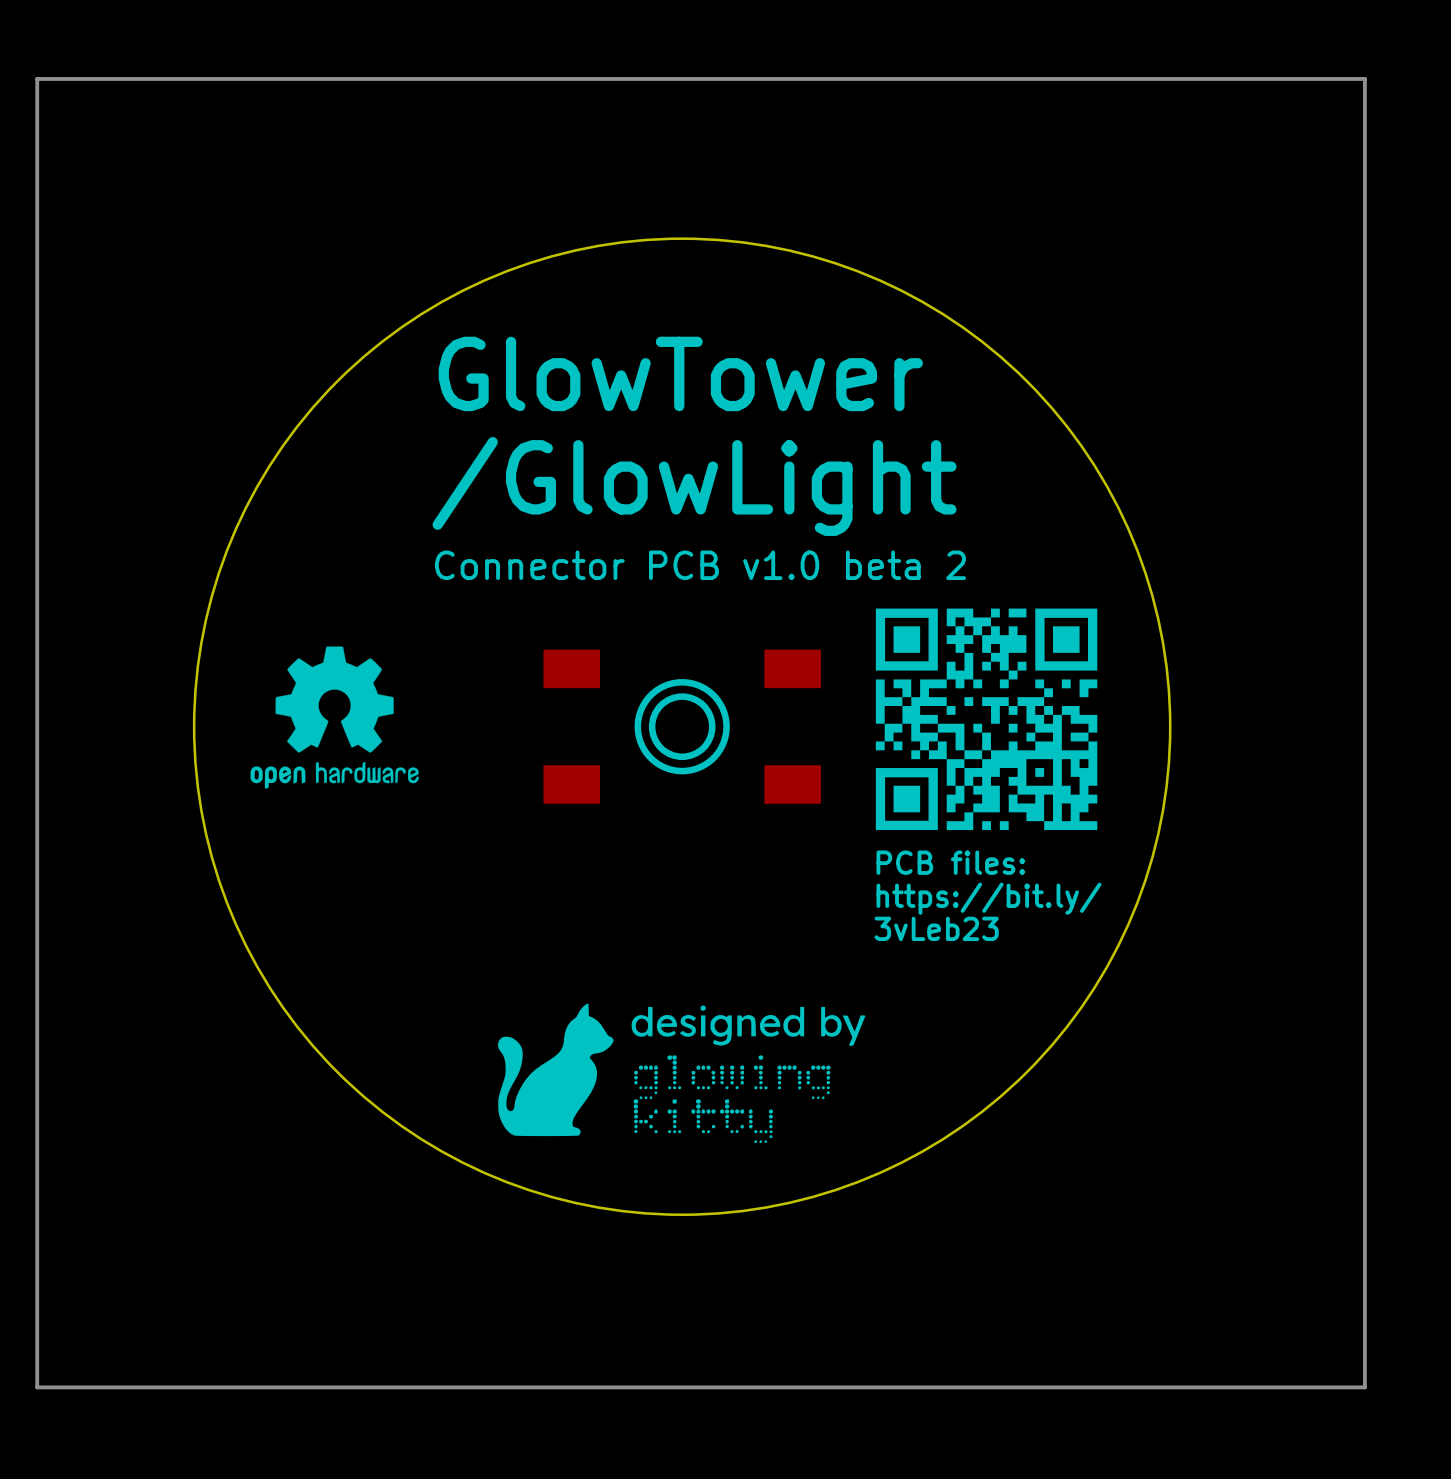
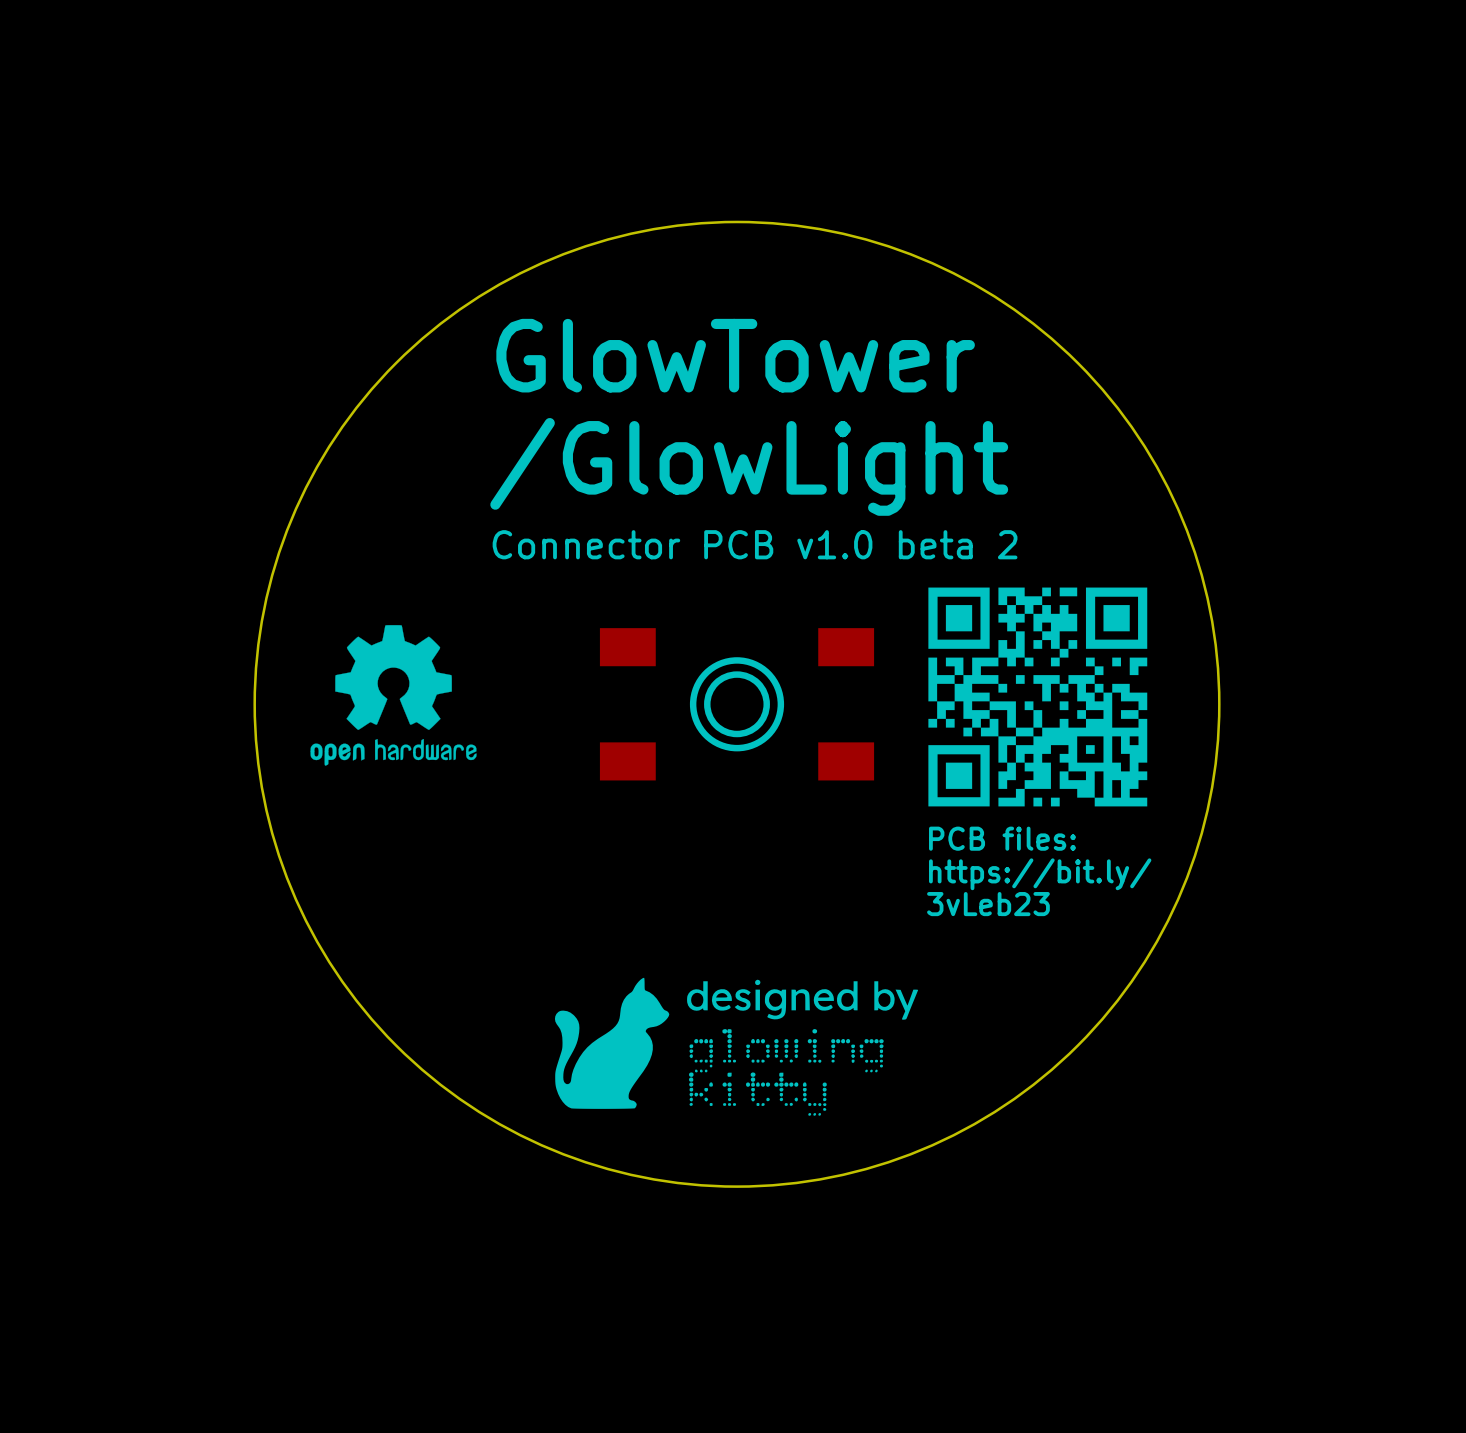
line: (37, 78) (1364, 78) (1364, 1387) (37, 1387) (37, 78) -> none

